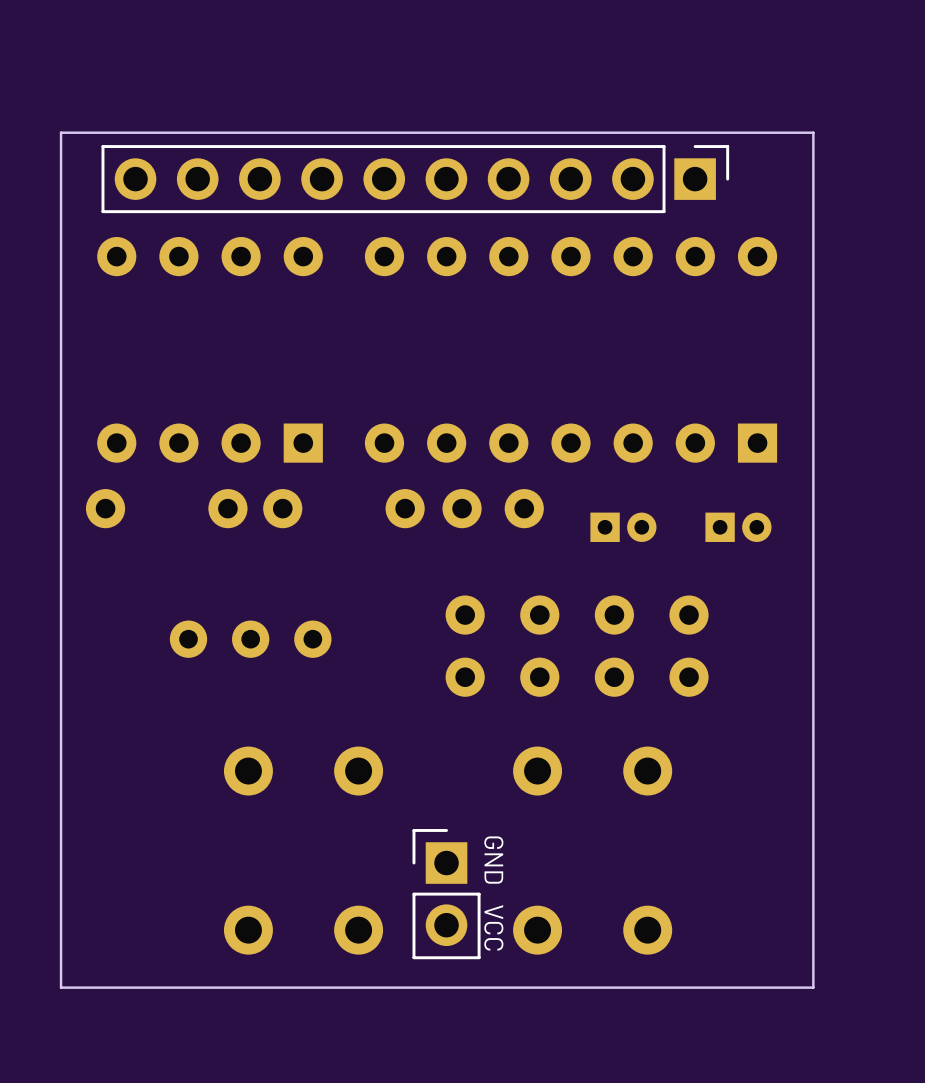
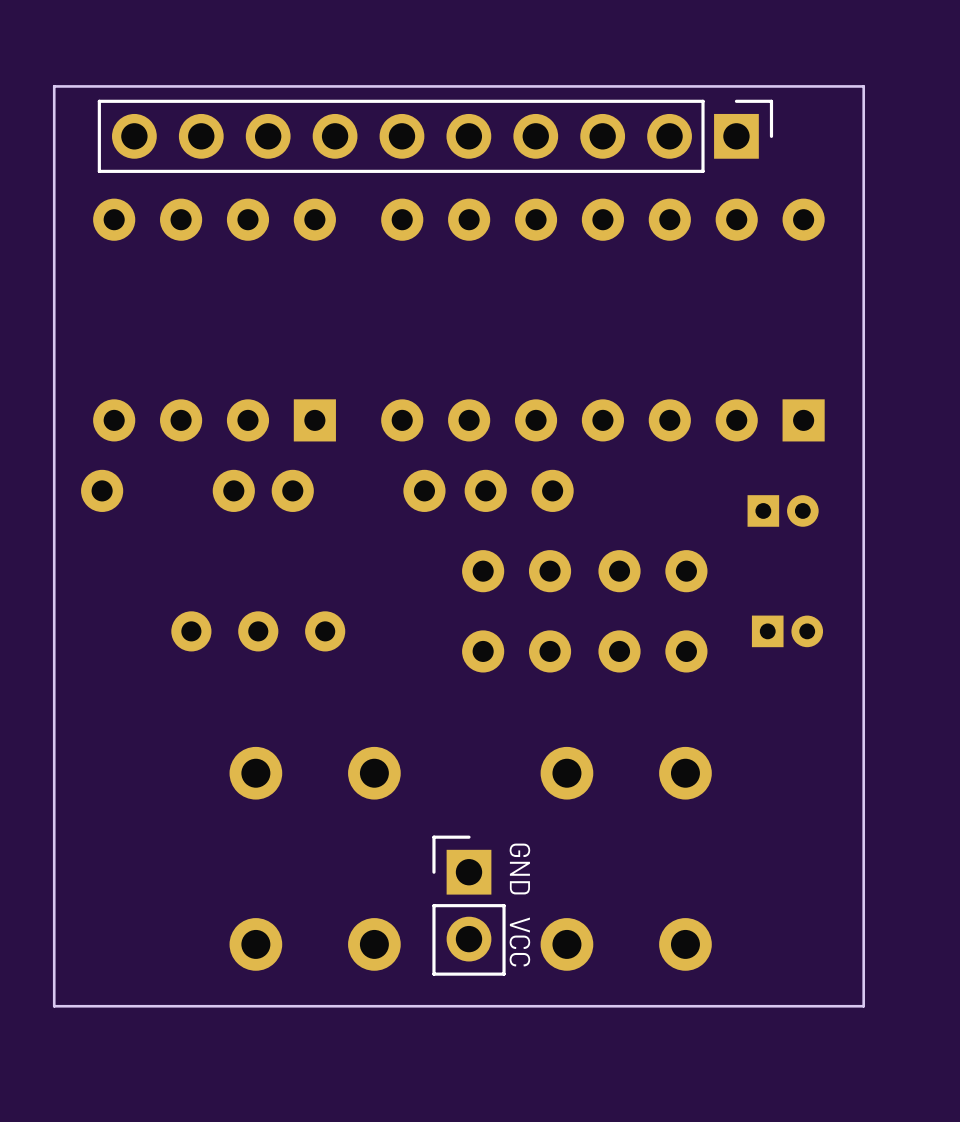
part position: (623, 527) -> (787, 631)
part: none -> (516, 571)
part: none -> (652, 571)
part: (465, 646) -> none
part: (539, 646) -> none
part rotation: 0° (614, 646) -> 90° clockwise (652, 651)
part: (689, 646) -> none
part: none -> (516, 651)

